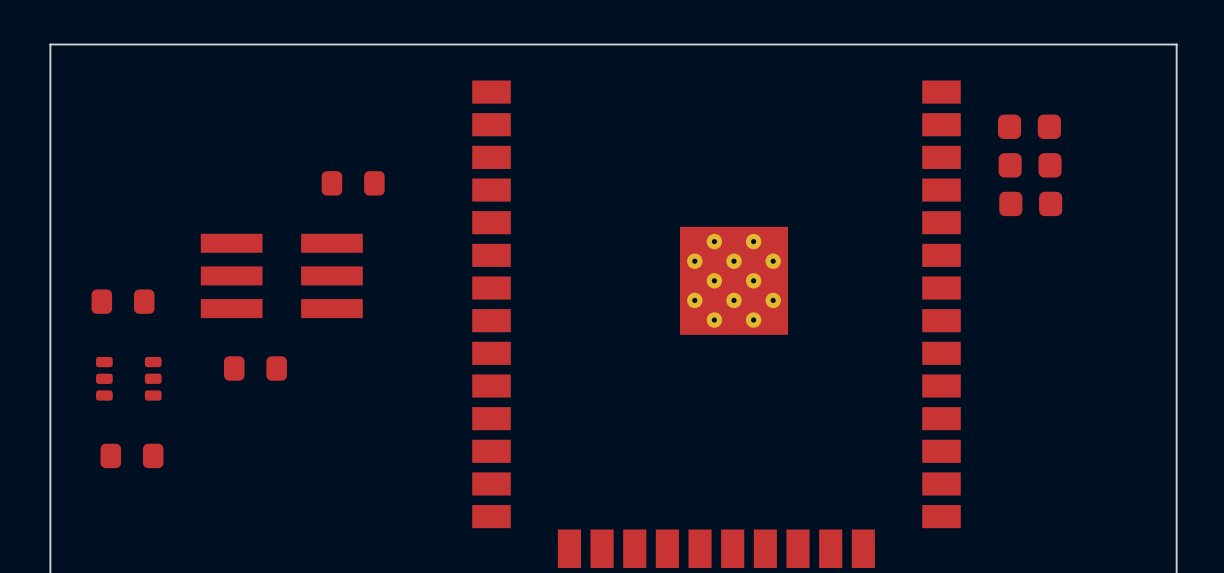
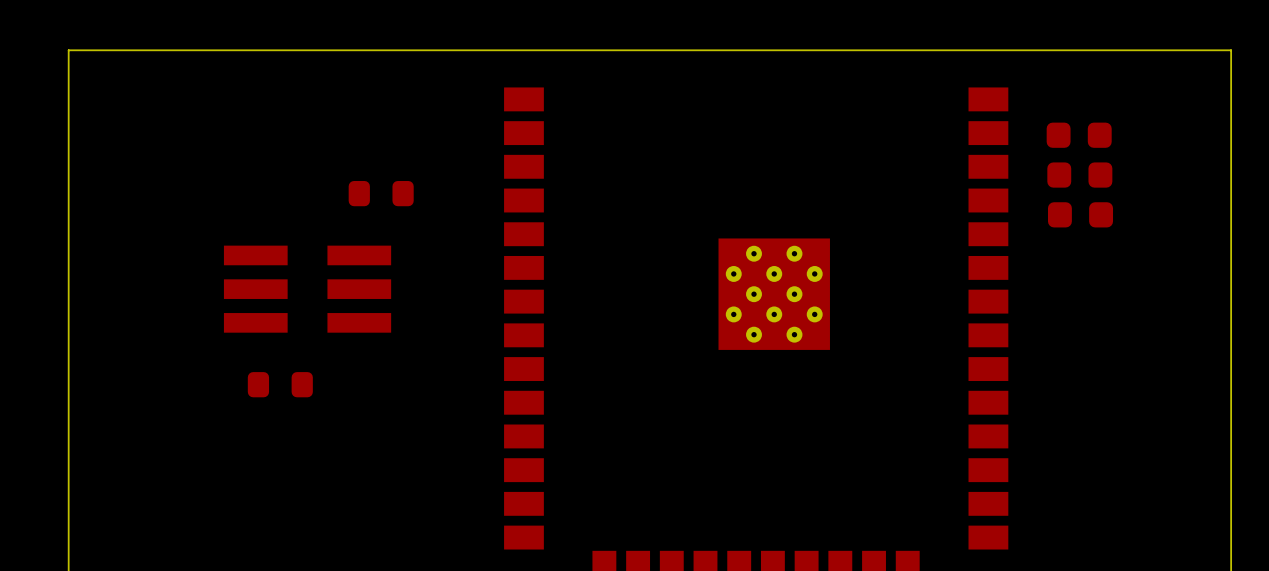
part: (123, 301) -> none
part: (128, 378) -> none
part: (132, 455) -> none

